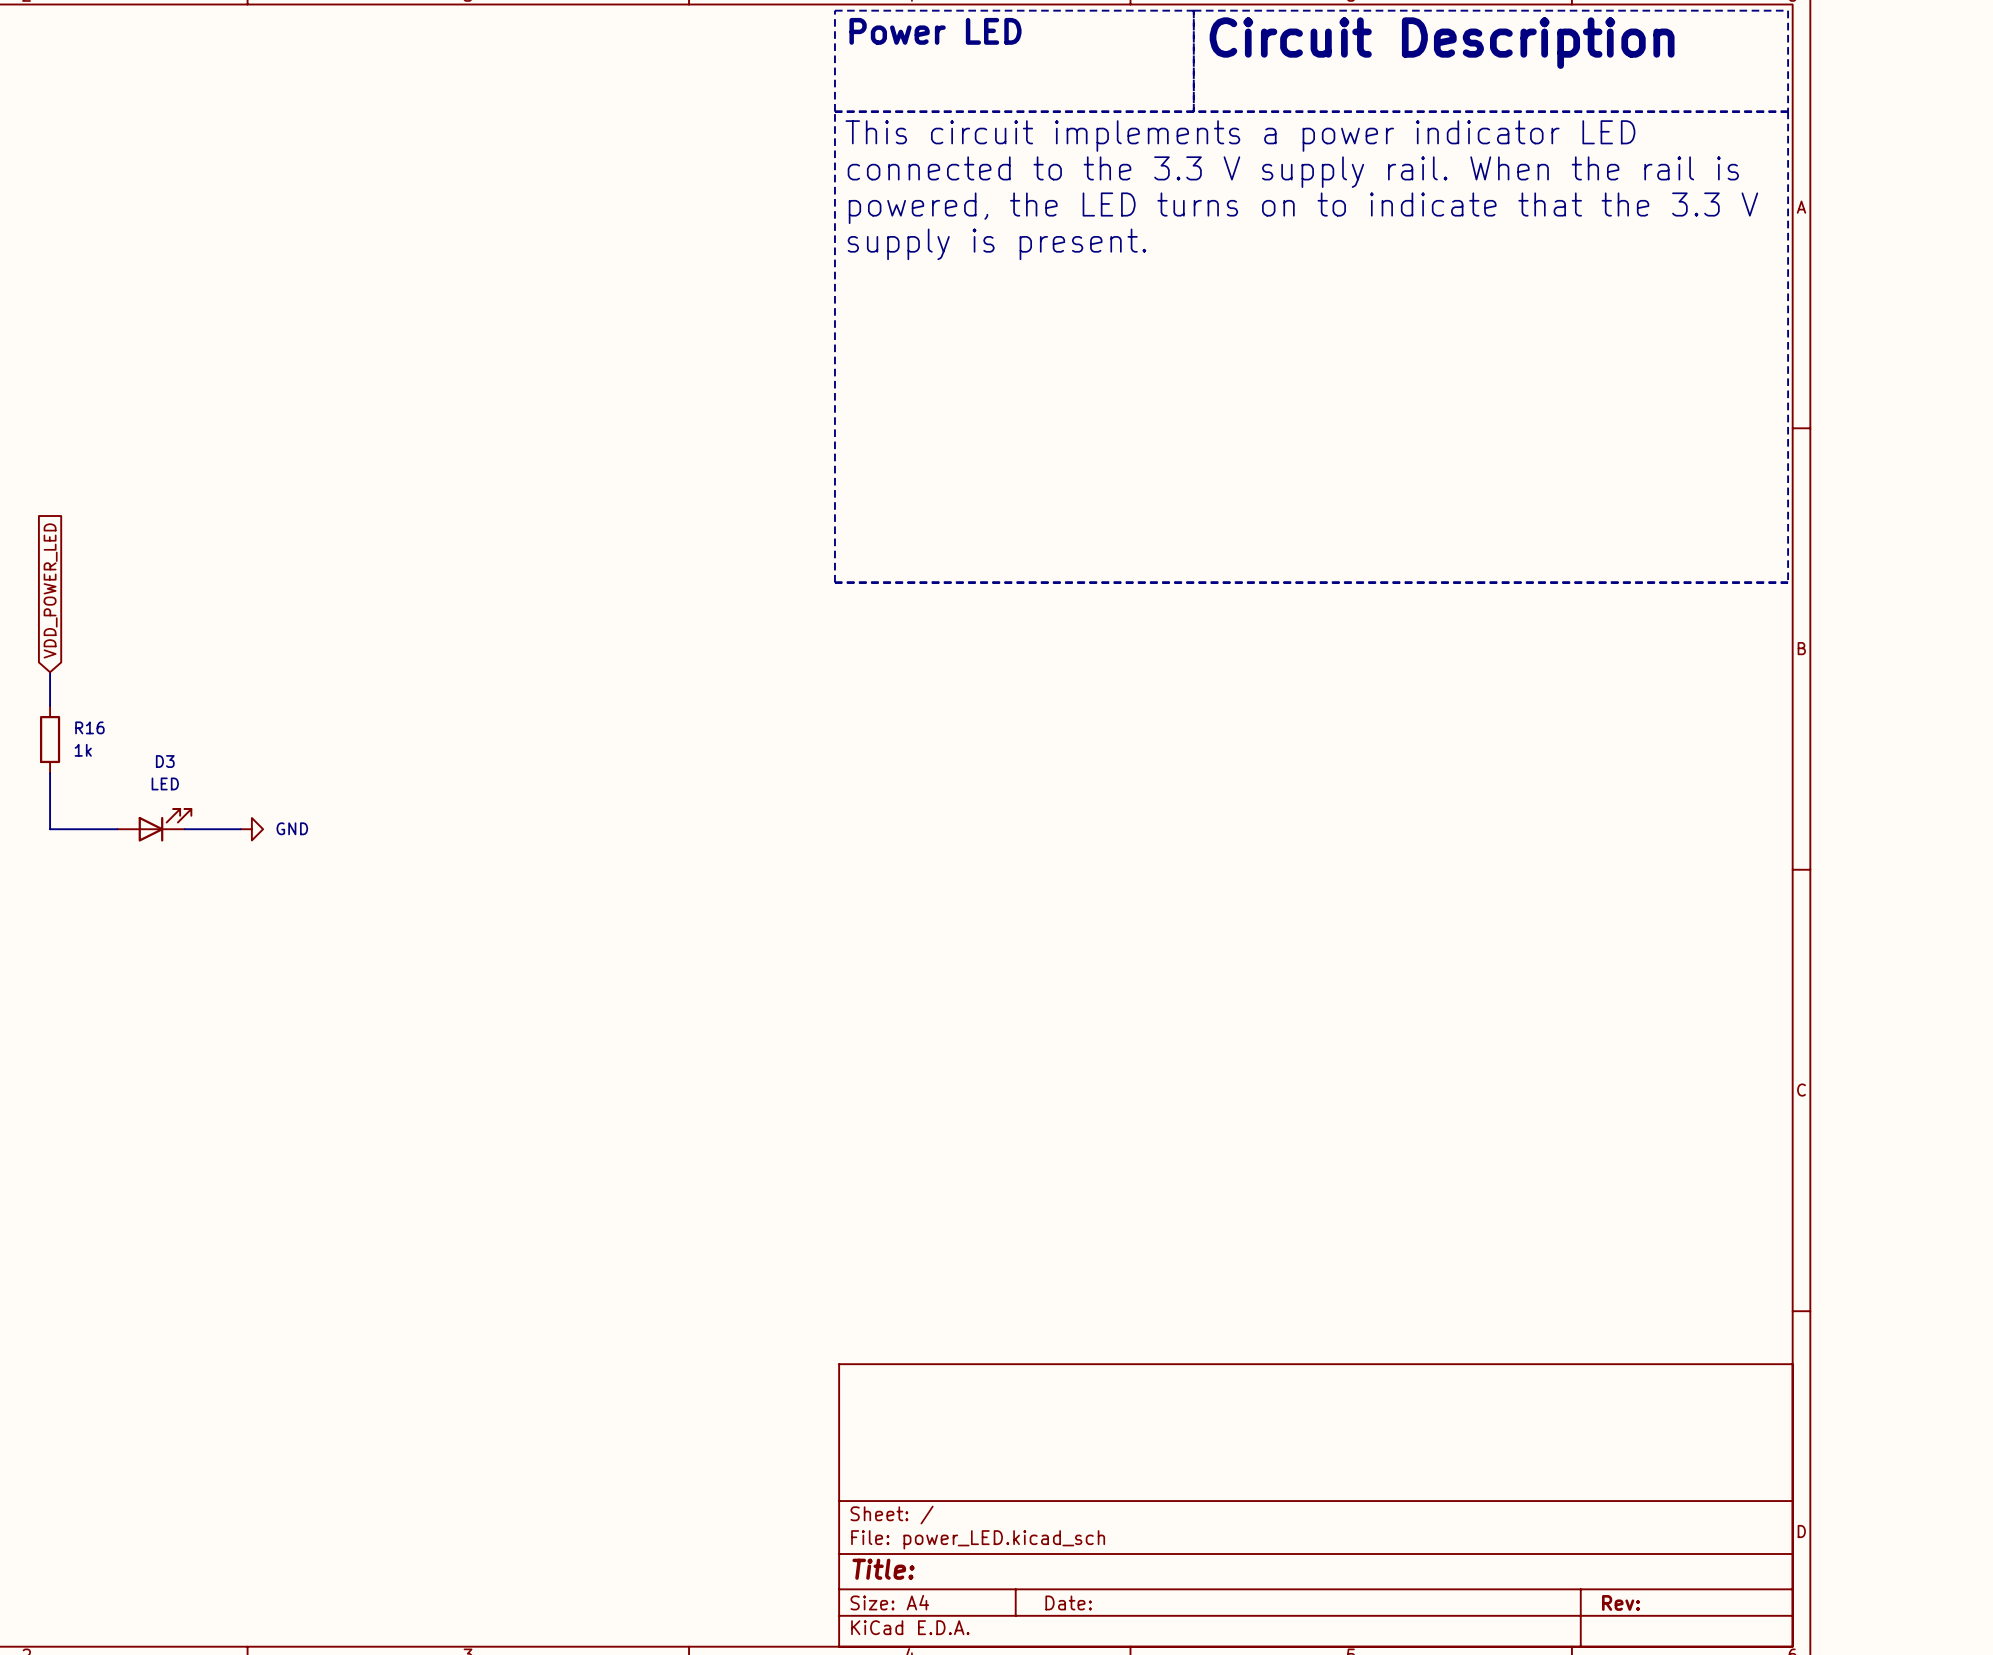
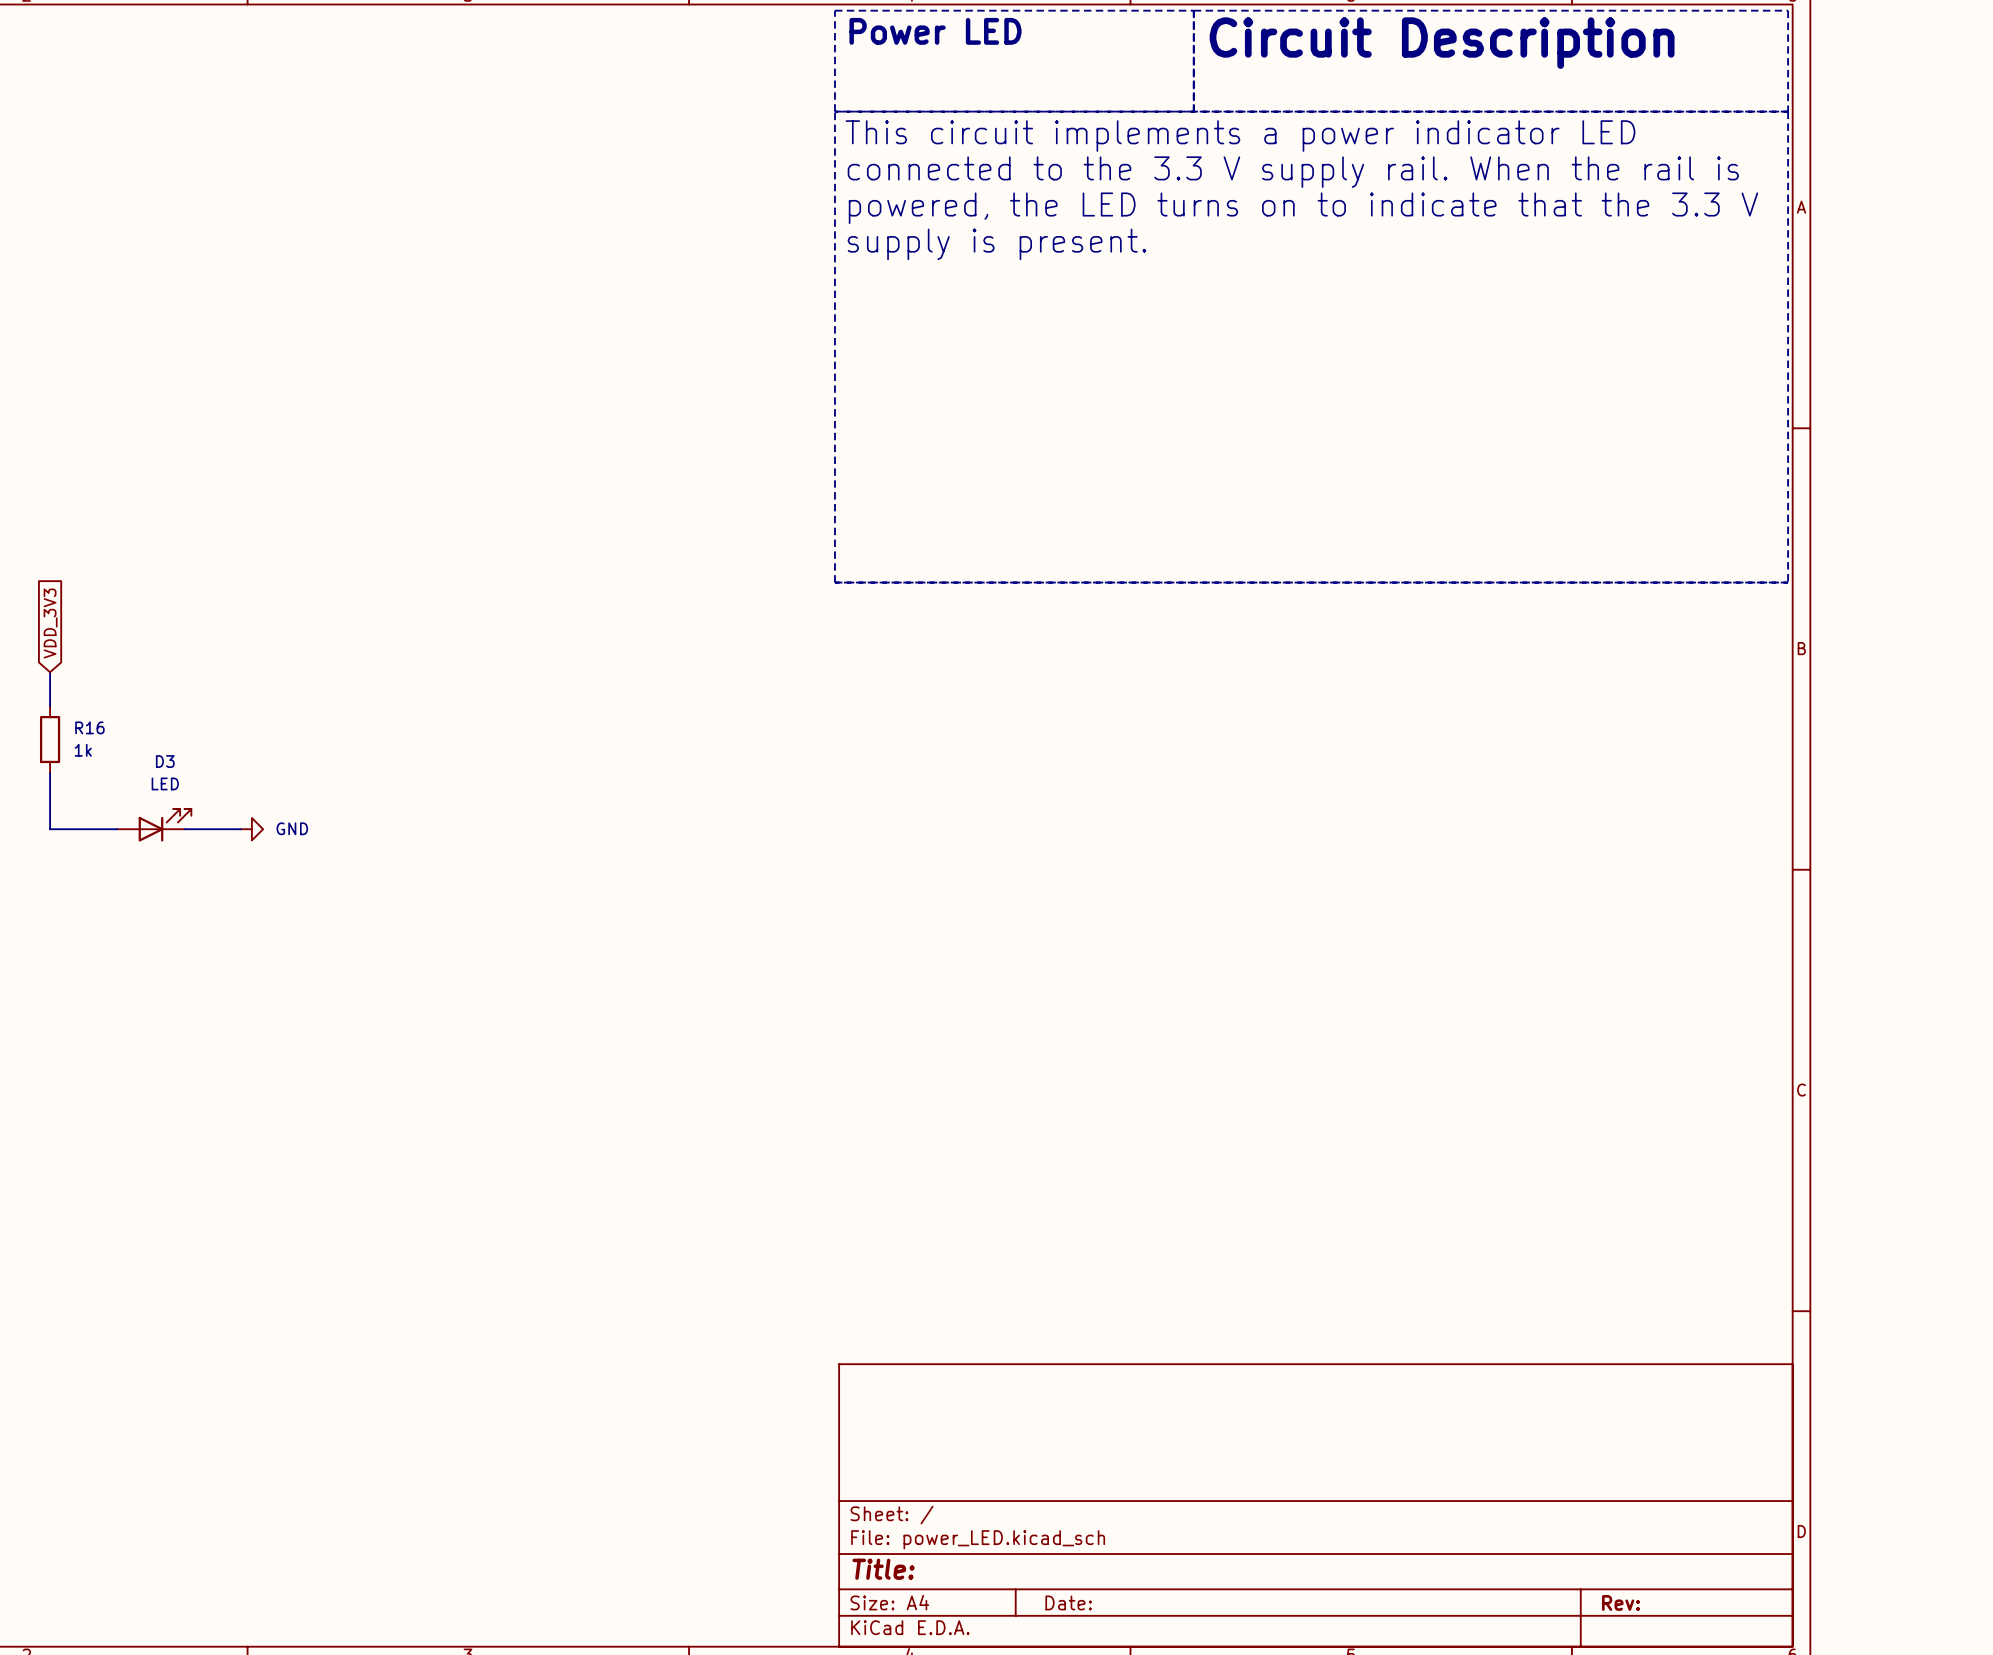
global label: VDD_POWER_LED (50, 590) -> VDD_3V3 (50, 623)

